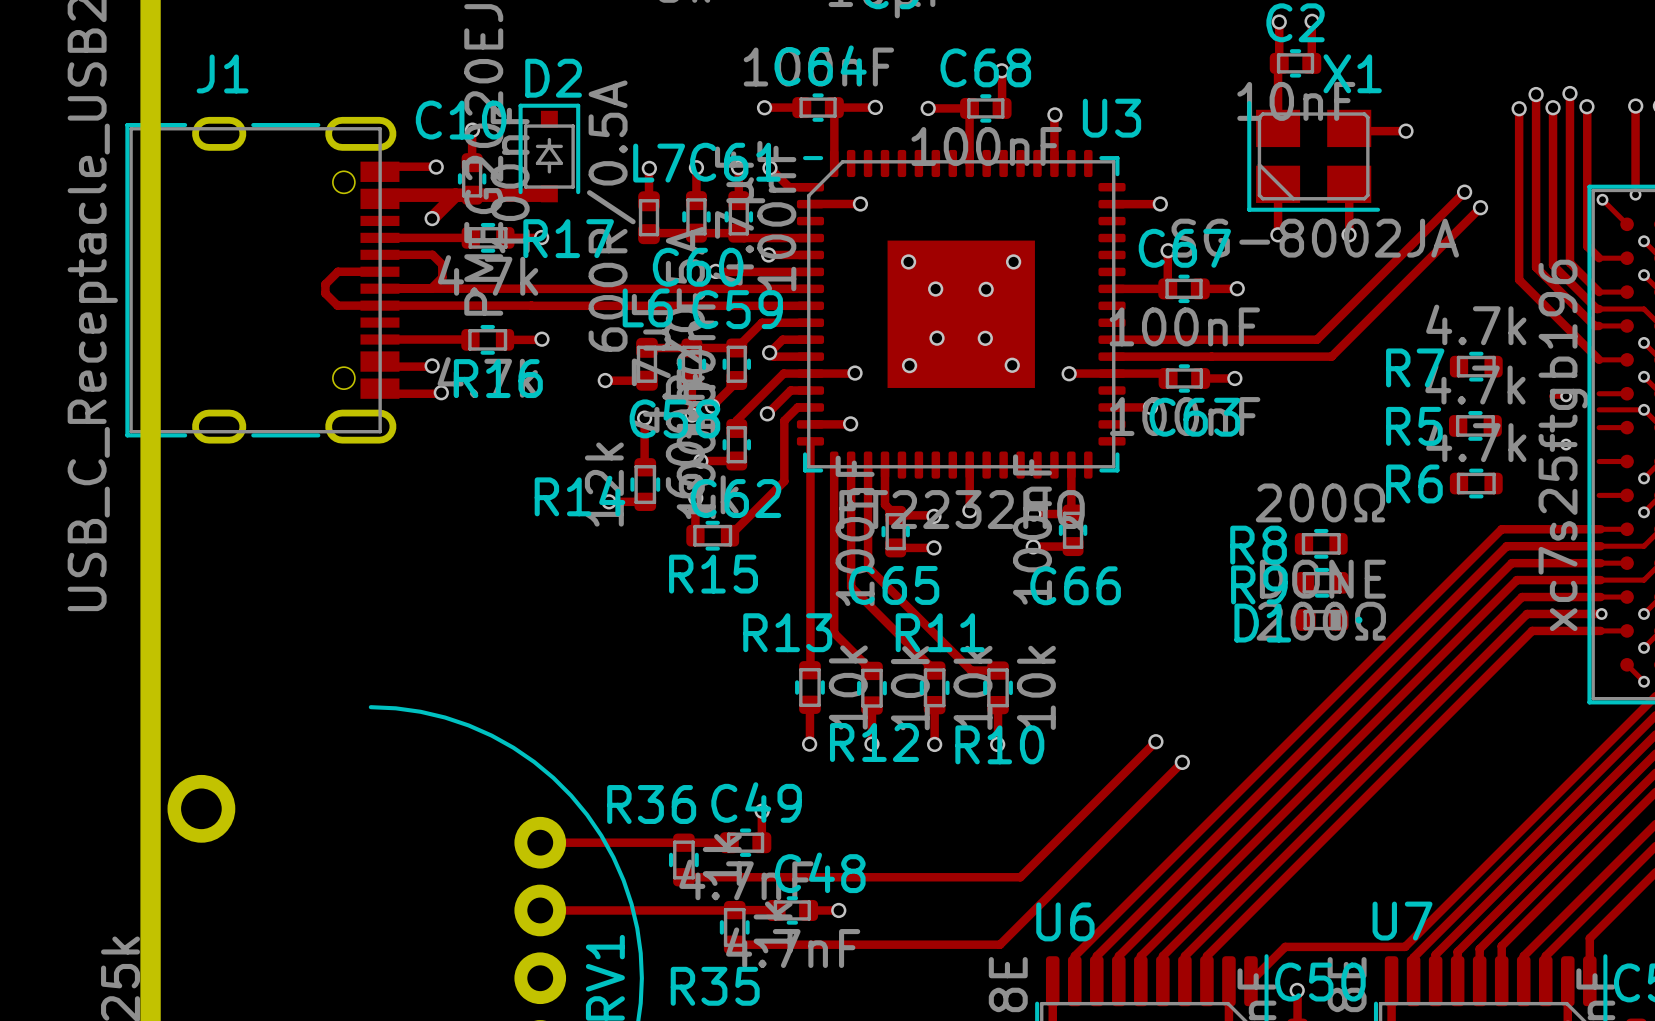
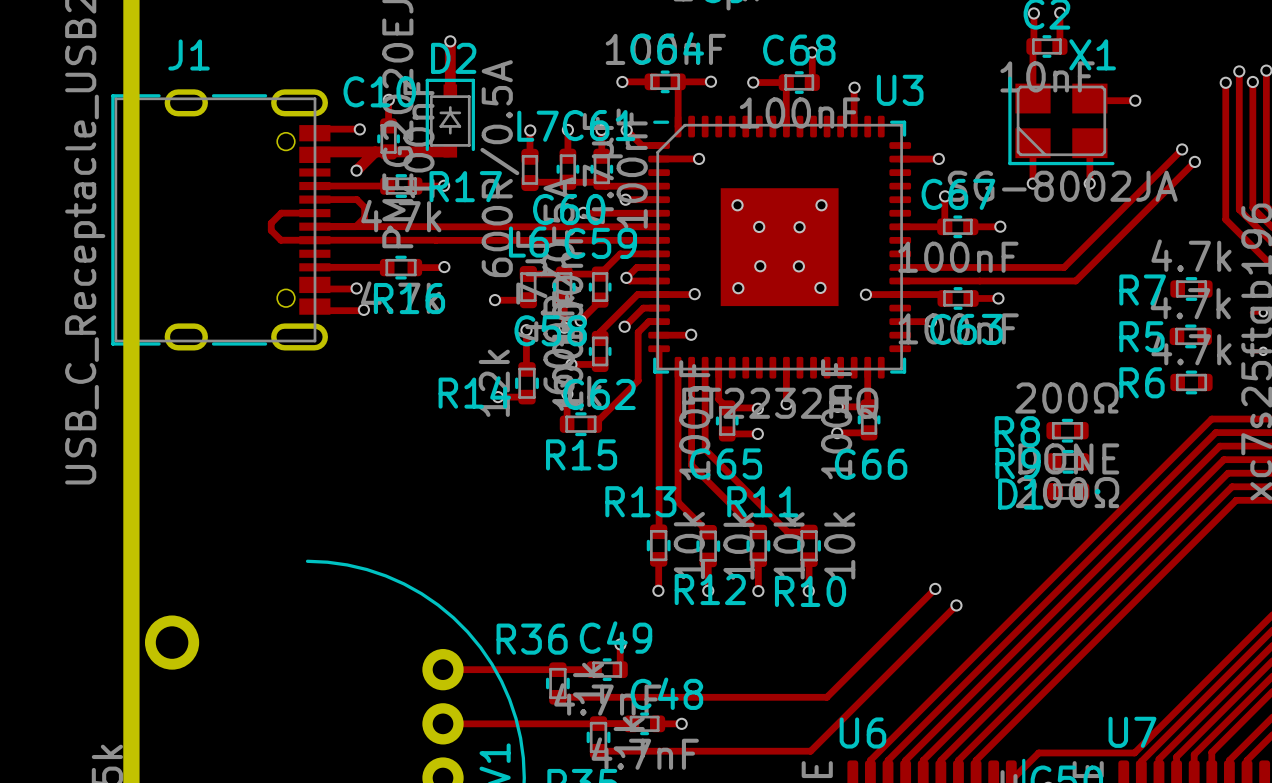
track: none -> (450, 41) (450, 91)
via: none -> (450, 41)

